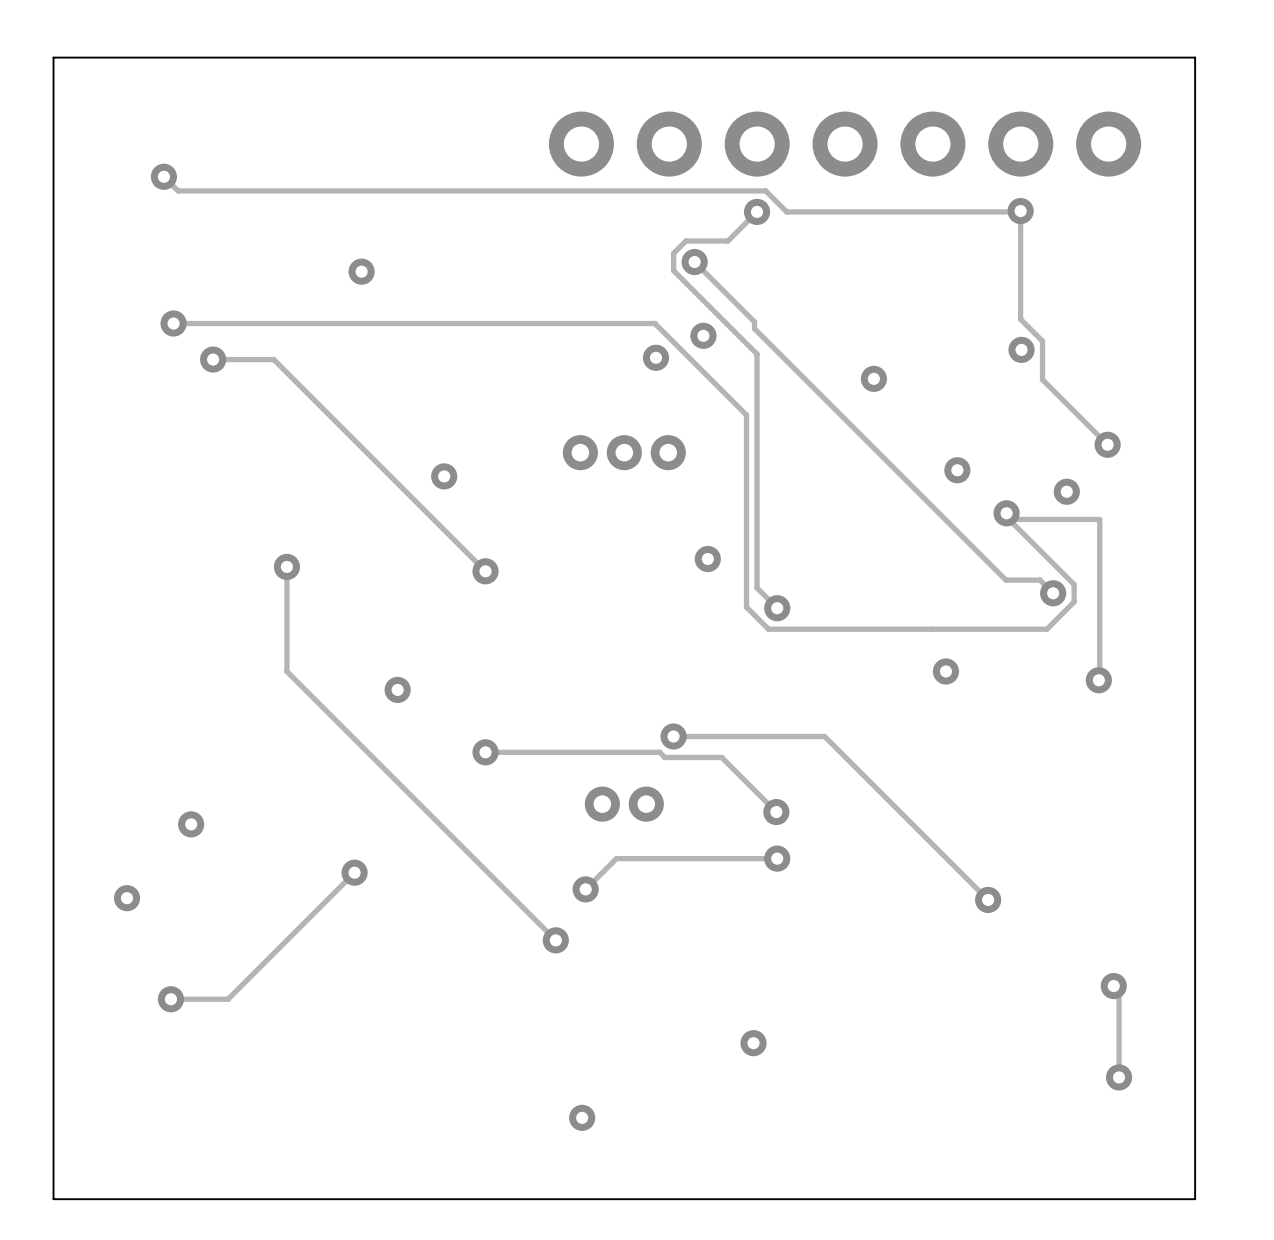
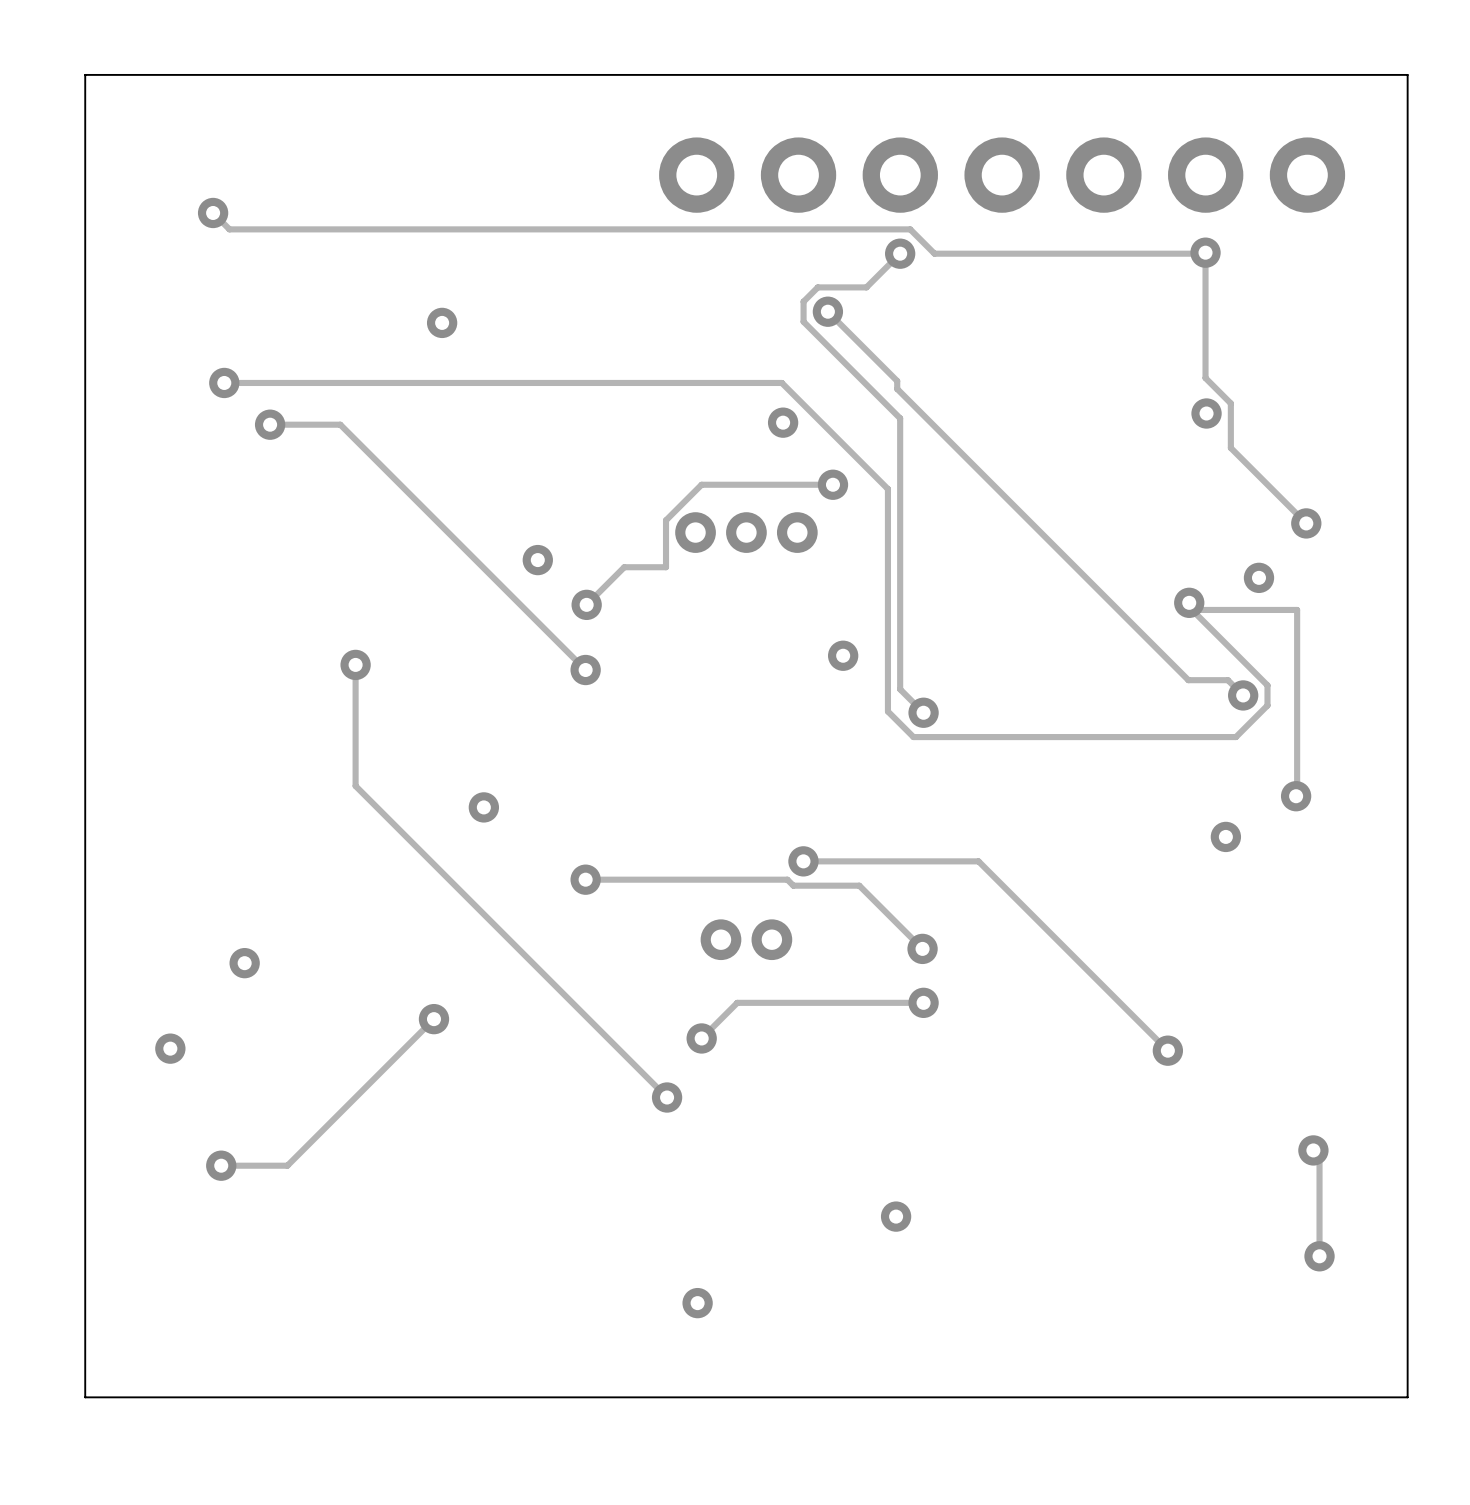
via position: (703, 335) -> (832, 484)
via: (873, 378) -> none
track: none -> (832, 484) (701, 484) (666, 520) (666, 567) (624, 567) (586, 604)
via: (957, 470) -> none
via: none -> (586, 604)
via position: (945, 671) -> (1225, 836)

